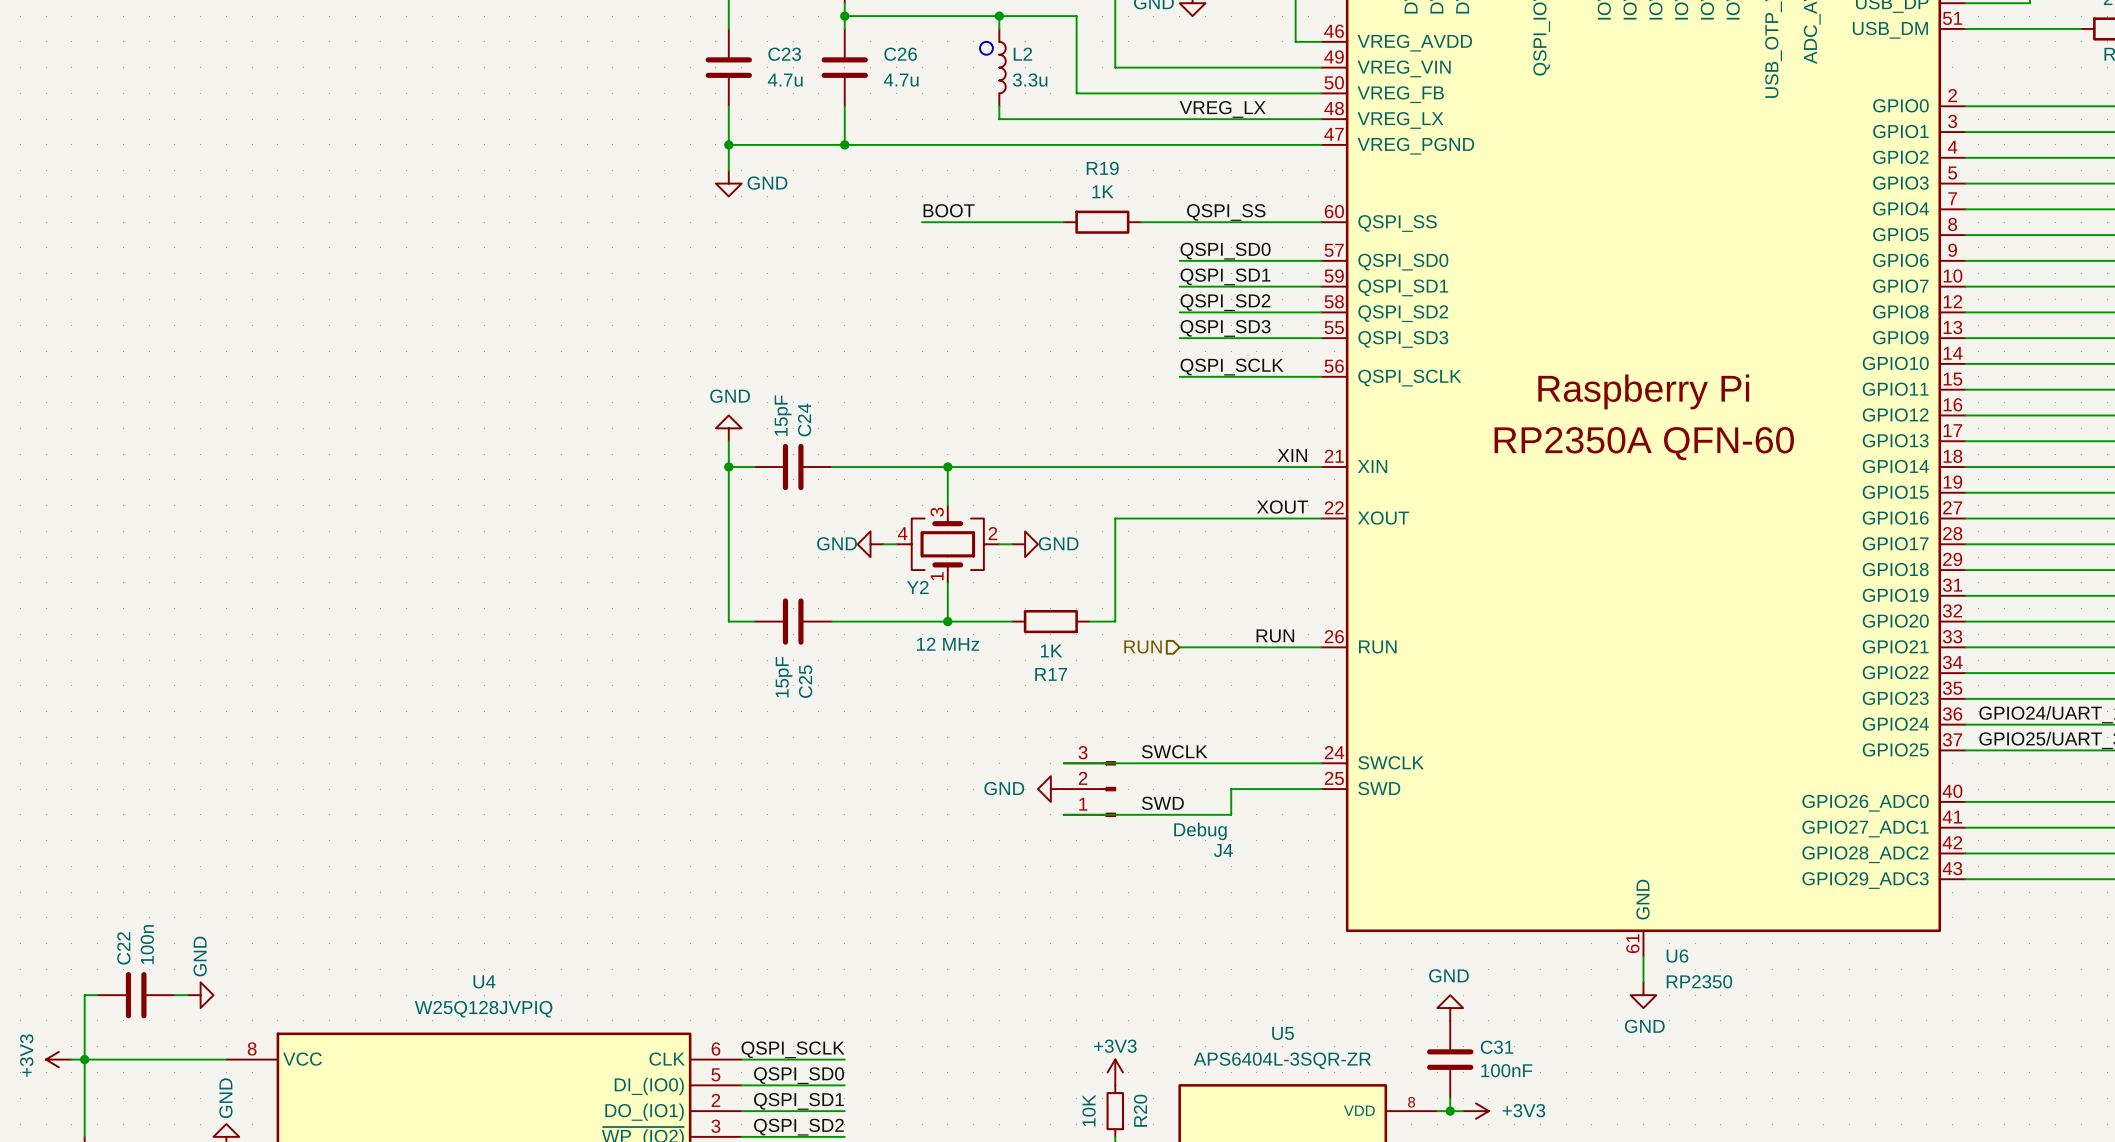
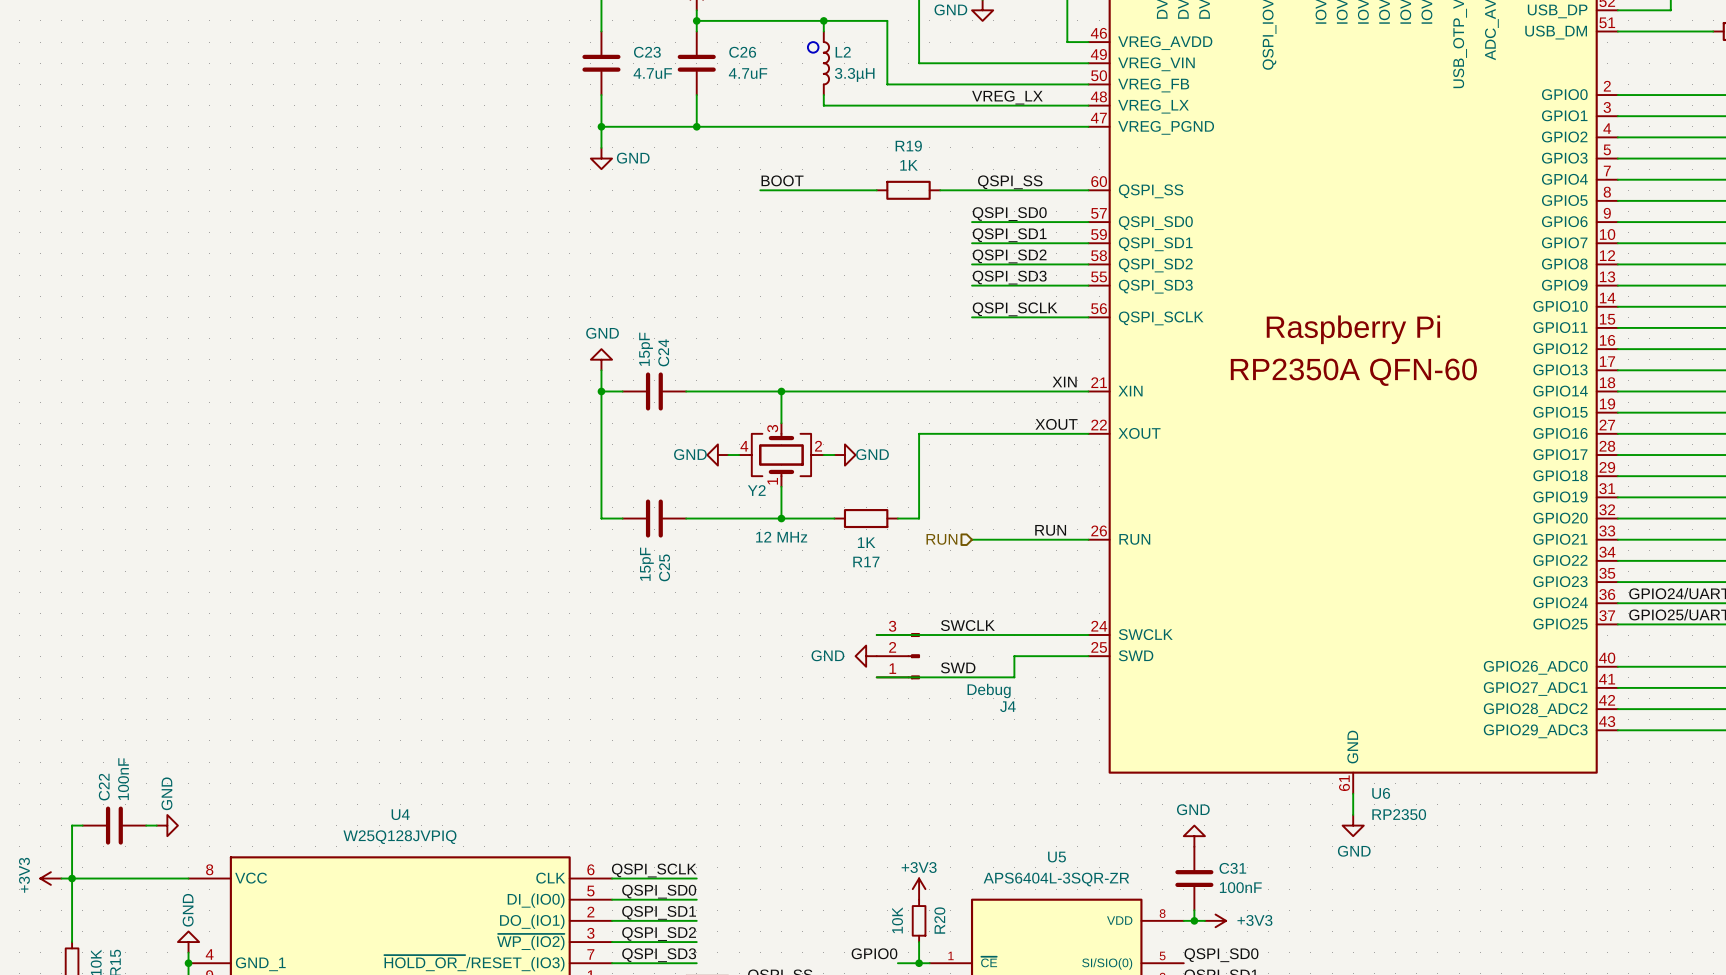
C23 value: 4.7u (785, 80) -> 4.7uF (652, 73)
C26 value: 4.7u (901, 80) -> 4.7uF (748, 73)
L2 value: 3.3u (1030, 80) -> 3.3µH (854, 74)
C22 value: 100n (147, 944) -> 100nF (123, 779)

